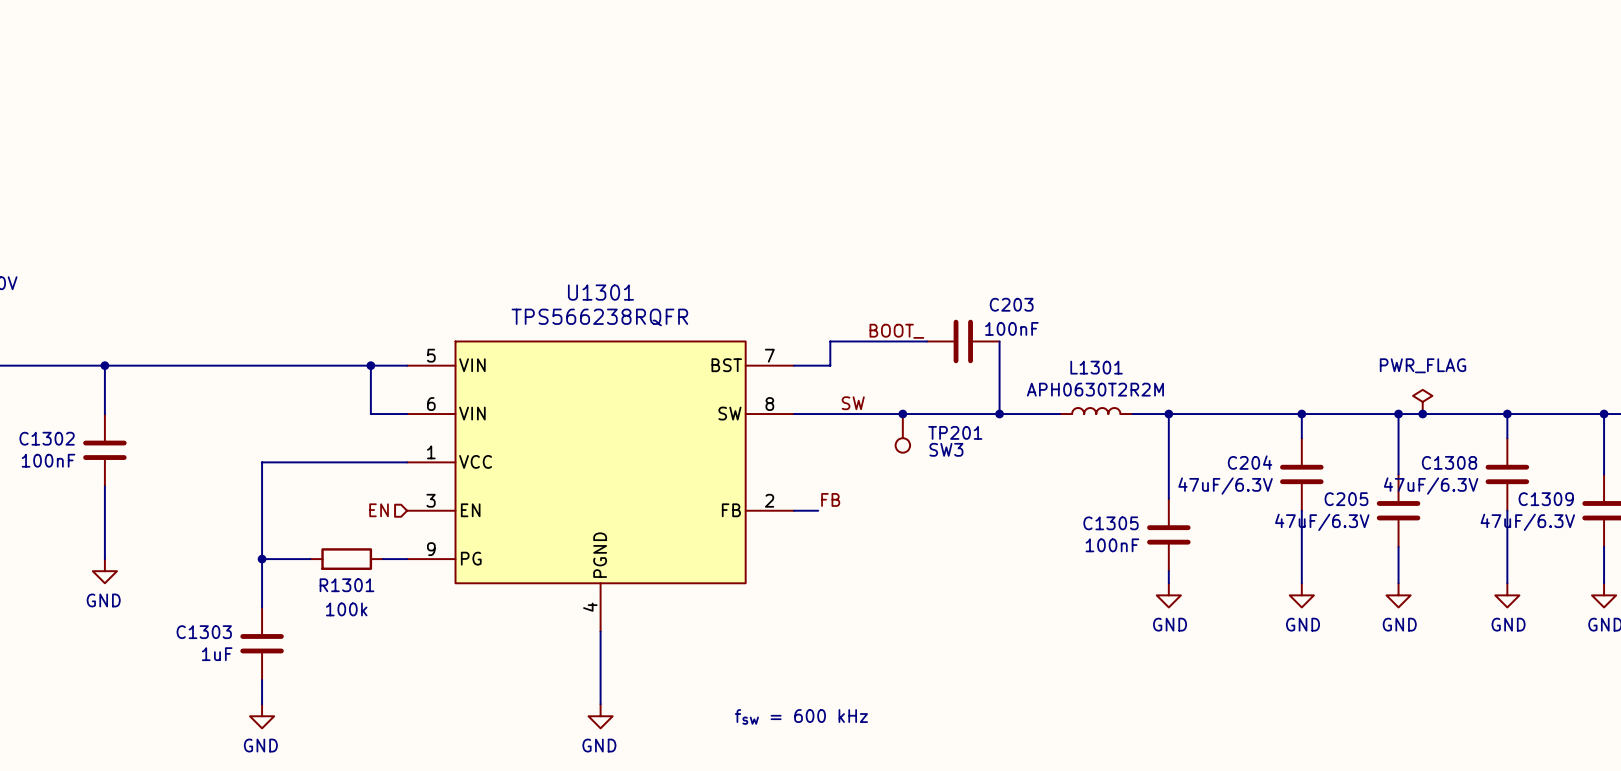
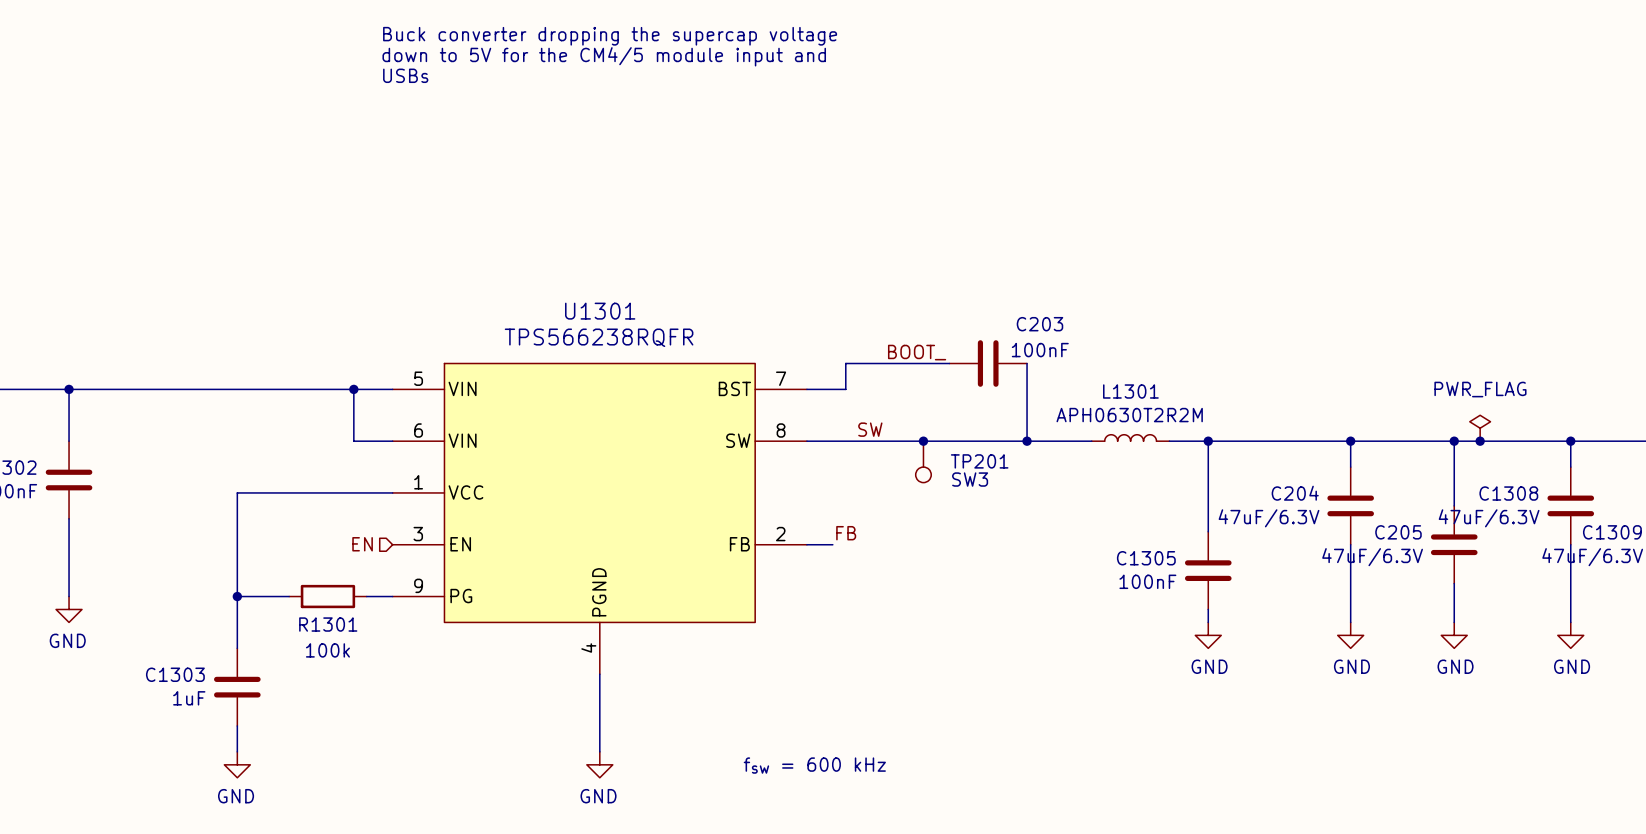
text: none -> Buck converter dropping the supercap voltage (610, 36)
text: none -> down to 5V for the CM4/5 module input and (604, 56)
text: none -> USBs (405, 75)

